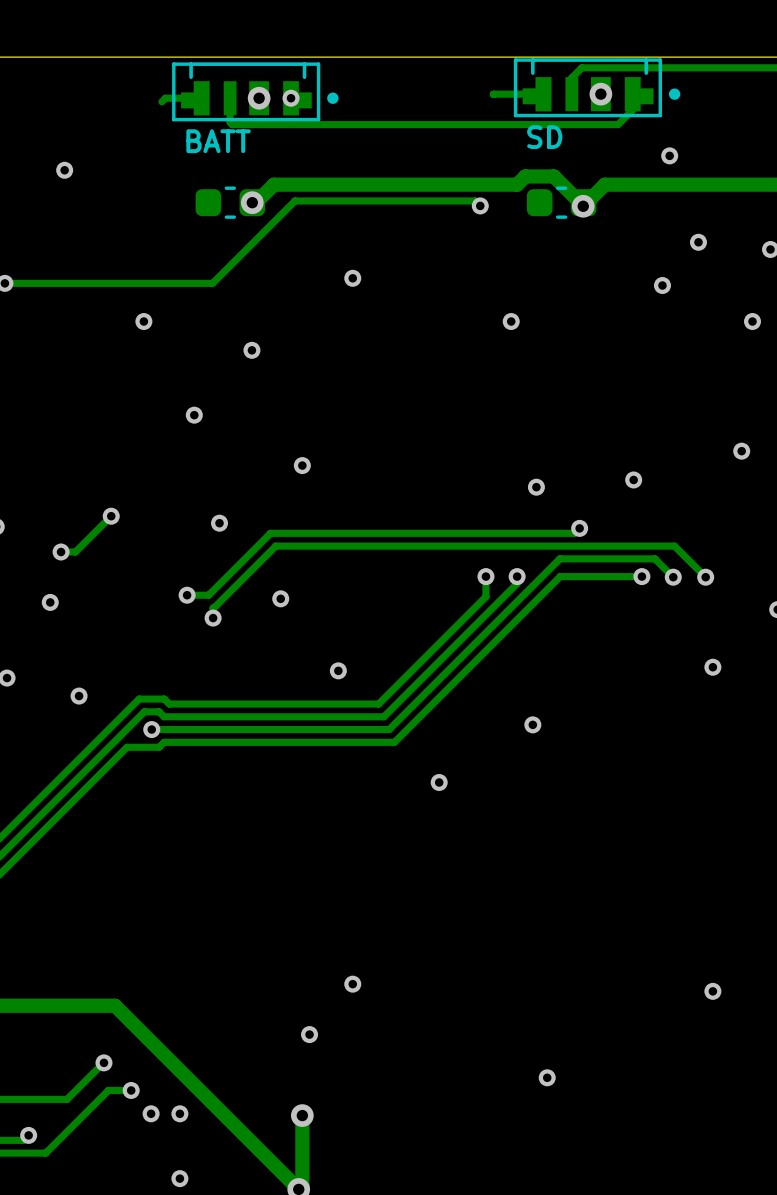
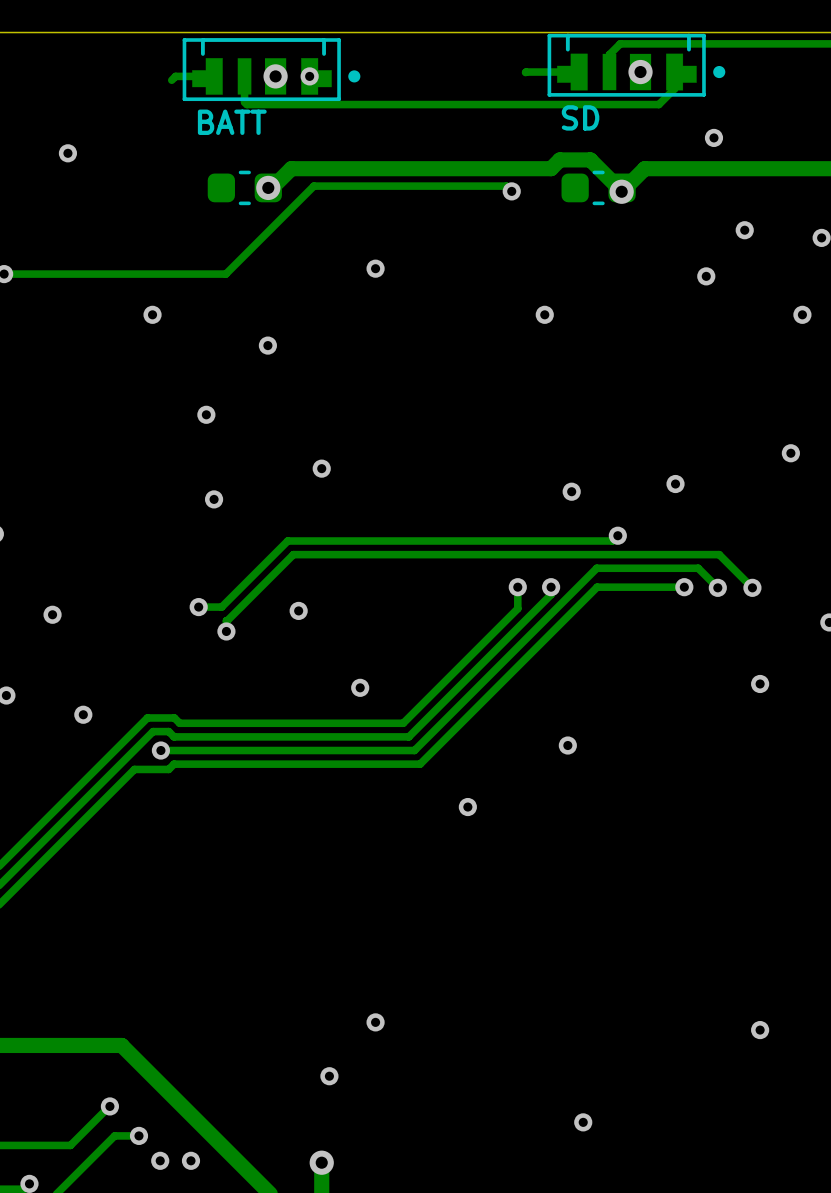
track: (111, 516) (75, 552) (61, 552) -> none
via: (111, 516) -> none
via position: (219, 523) -> (214, 499)
via: (61, 552) -> none

